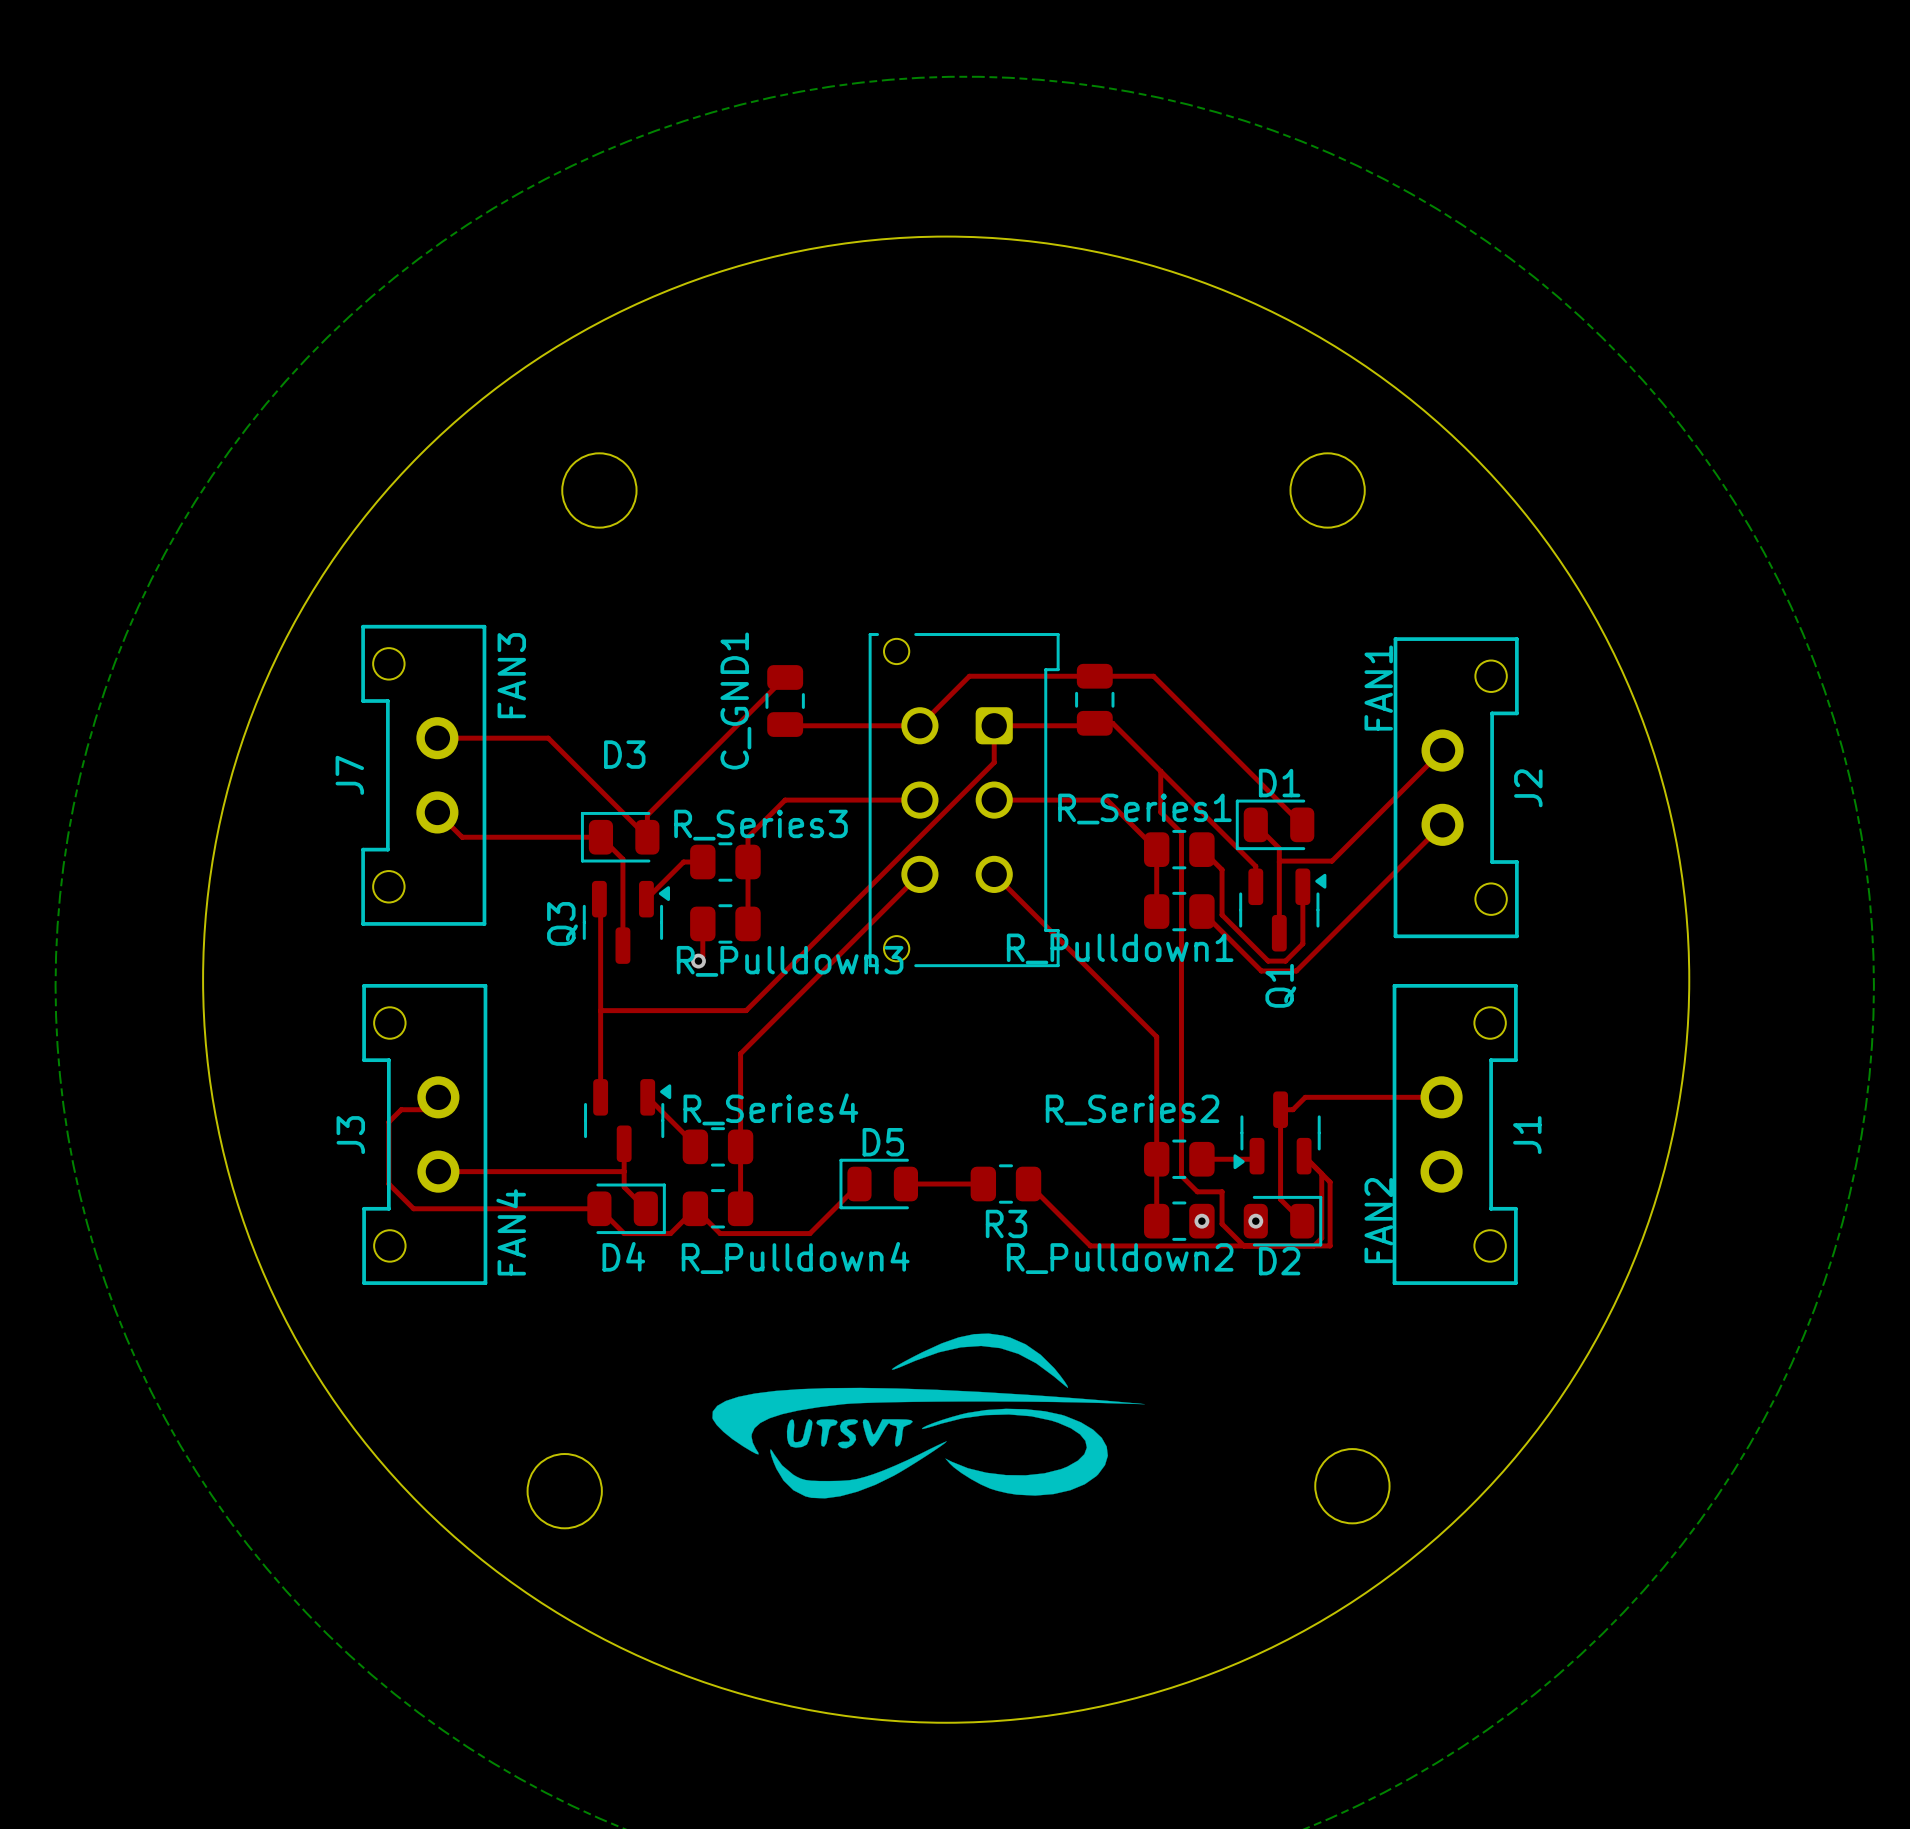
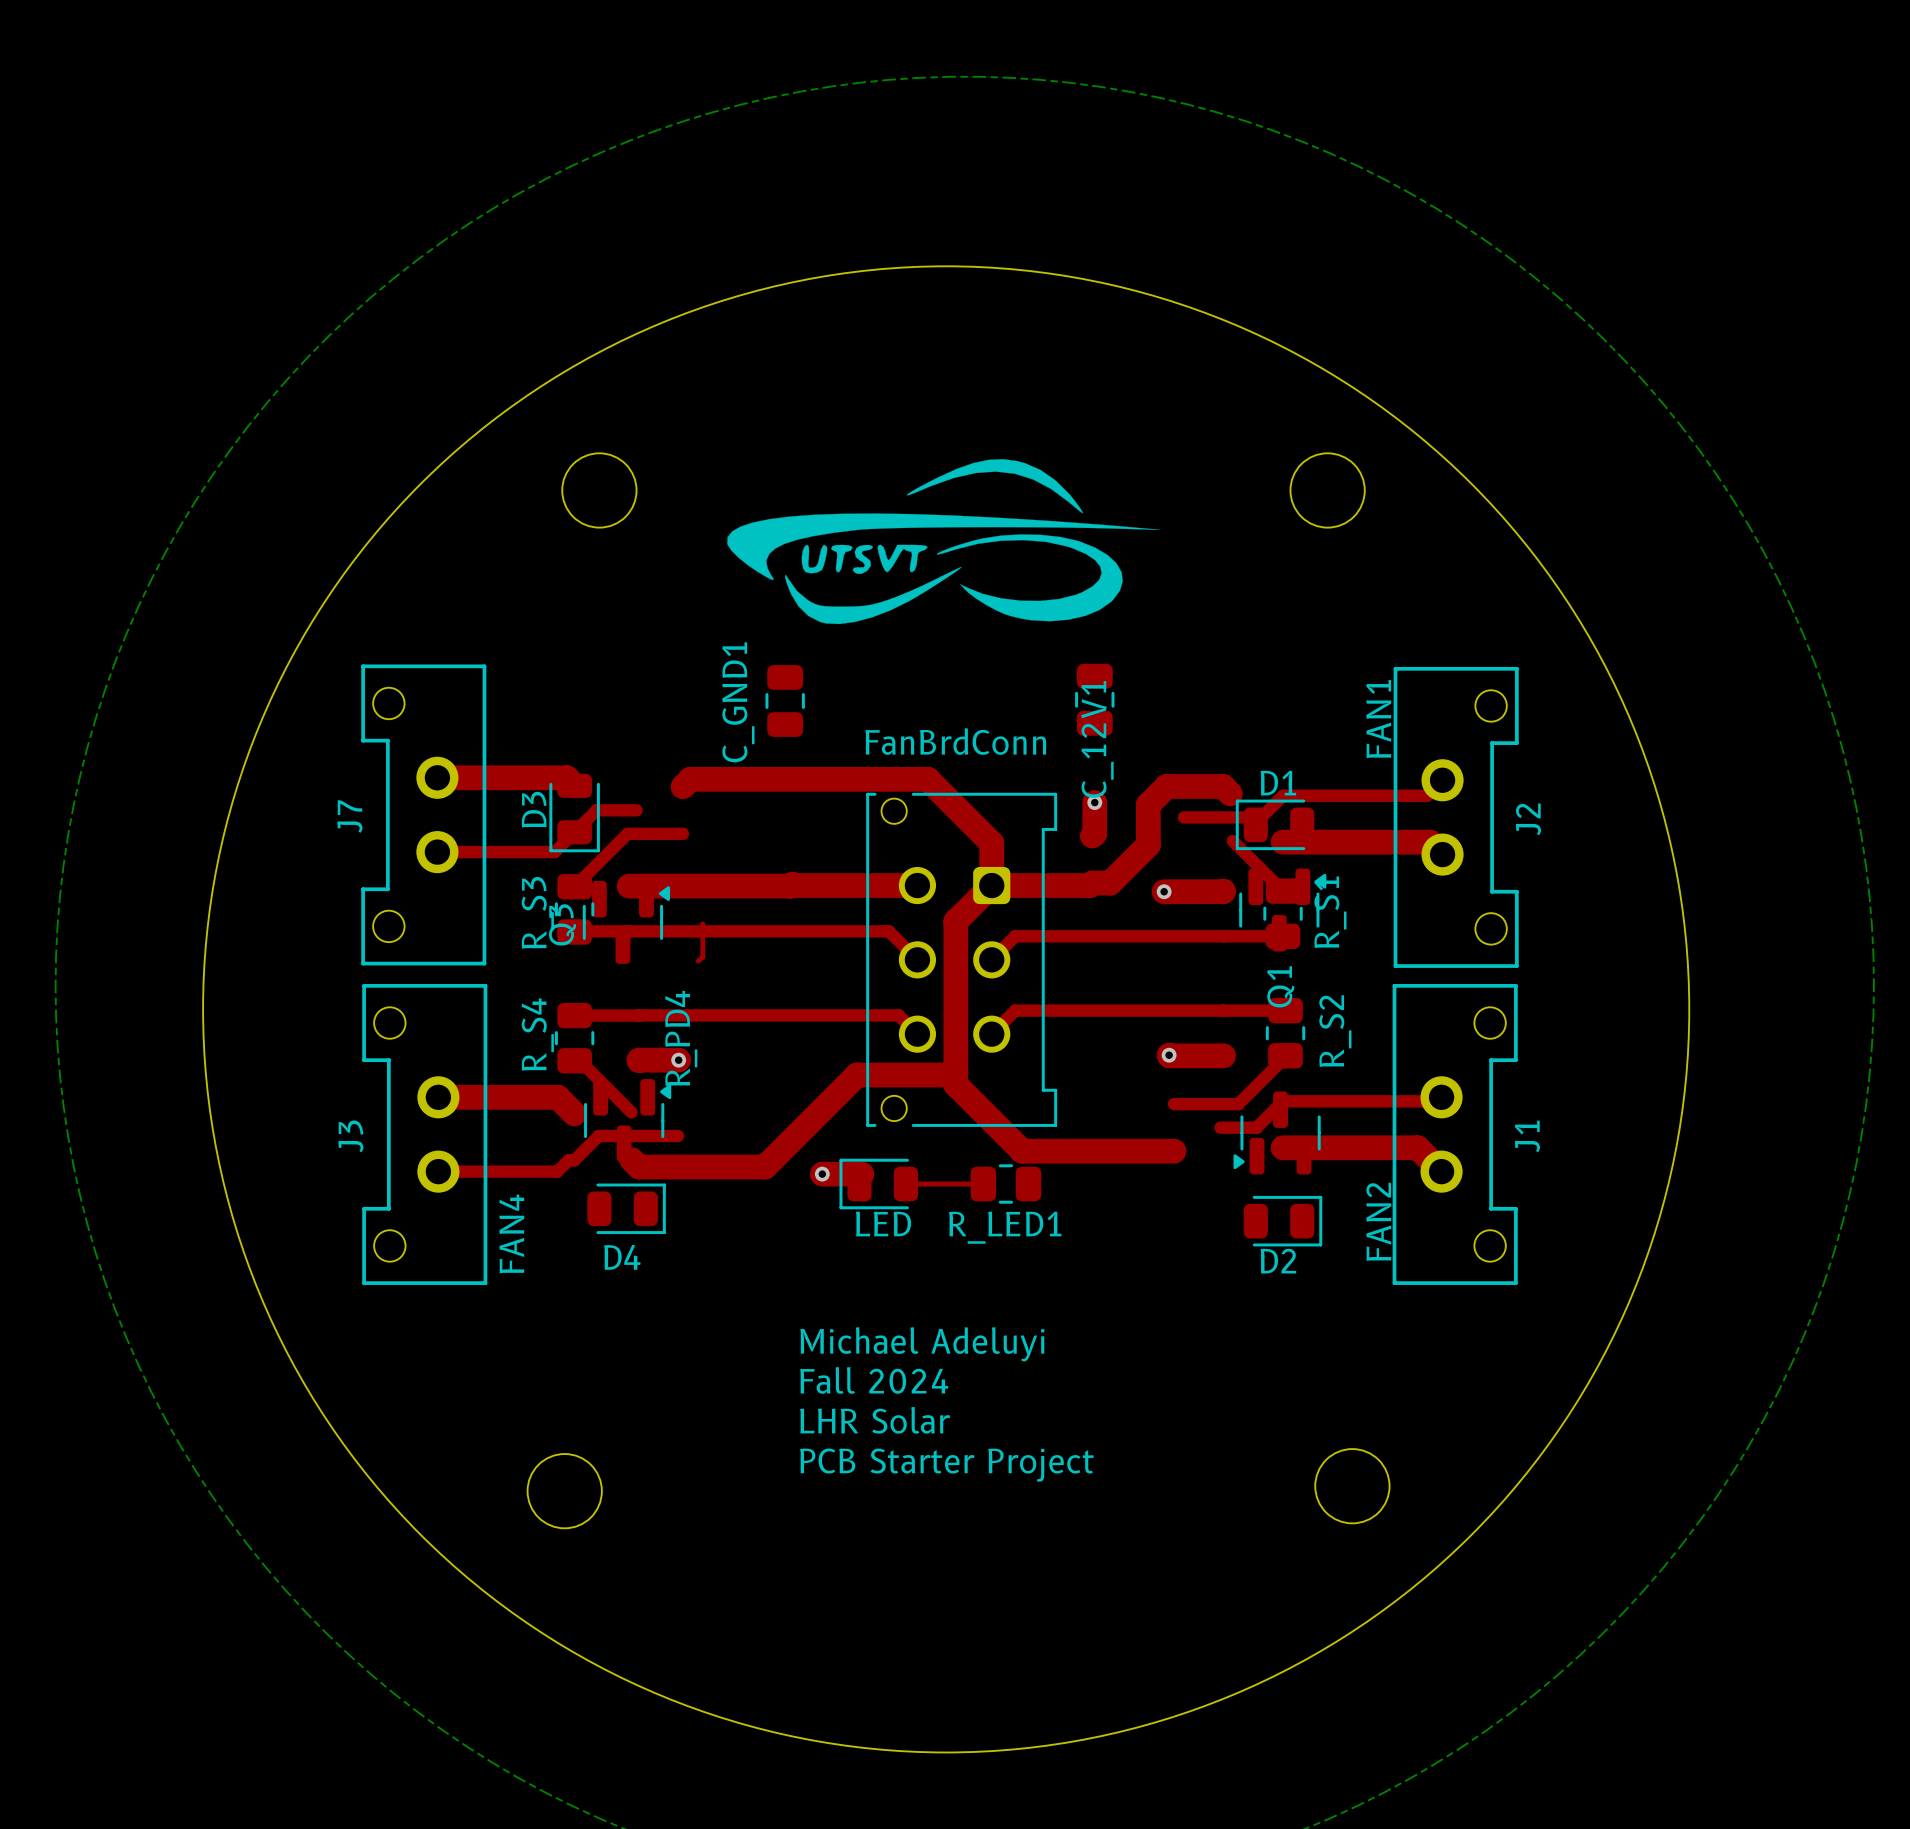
drawing: none -> [727, 459, 1160, 625]
J7 value: FAN3 (511, 675) -> none
top track: (785, 677) (647, 815) (647, 837) (548, 738) (437, 738) -> none
top track: (785, 724) (919, 725) (969, 676) (1153, 676) (1302, 824) -> none
text: none -> C_12V1 (1097, 739)
top track: (1442, 750) (1332, 861) (1279, 862) -> none
top track: (1160, 771) (1160, 812) (1181, 832) (1181, 1175) (1197, 1191) (1222, 1191) (1222, 1223) (1244, 1245) -> none
J7 position: (423, 775) -> (423, 814)
top track: none -> (437, 777) (566, 777) (574, 785)
top track: none -> (1442, 780) (1427, 795) (1283, 795) (1261, 817) (1183, 817)
top track: none -> (682, 786) (690, 779) (927, 779) (991, 843) (991, 885)
J2 position: (1456, 787) -> (1456, 817)
top track: none -> (1230, 793) (1222, 786) (1166, 786) (1148, 804) (1148, 844) (1110, 883) (1092, 883) (1089, 885) (991, 885)
top track: (919, 800) (785, 800) (748, 837) (748, 923) -> none
part: (964, 800) -> none
top track: (994, 800) (1107, 800) (1156, 849) (1156, 911) (1158, 913) -> none
top track: none -> (1094, 802) (1094, 833) (1092, 836)
via: none -> (1094, 802)
top track: none -> (636, 810) (596, 810) (554, 852) (437, 852)
top track: (437, 812) (462, 837) (600, 837) (622, 859) (622, 945) -> none
top track: (1255, 824) (1279, 848) (1279, 933) -> none
top track: (1442, 824) (1296, 971) (1261, 971) (1201, 911) -> none
top track: none -> (682, 833) (627, 833) (574, 886)
D3 rotation: 0° (620, 837) -> 90° counterclockwise (574, 813)
D3 position: (620, 837) -> (574, 813)
top track: none -> (1232, 840) (1283, 891)
top track: none -> (1283, 842) (1430, 842) (1442, 854)
R_Series1: (1179, 849) -> none
top track: (1201, 849) (1222, 869) (1222, 914) (1268, 961) (1285, 961) (1302, 943) (1302, 886) -> none
top track: (702, 862) (683, 862) (646, 899) -> none
R_Series3: (725, 862) -> none
top track: (919, 874) (740, 1053) (740, 1208) -> none
top track: (994, 874) (1156, 1036) (1156, 1221) -> none
top track: none -> (917, 885) (792, 884) (790, 886) (629, 886)
top track: none -> (991, 885) (955, 921) (955, 1084) (1022, 1151) (1174, 1151)
top track: (1255, 886) (1255, 866) (1112, 723) (1094, 723) (1092, 725) (994, 725) (994, 762) (746, 1010) (600, 1010) -> none
via: none -> (1164, 891)
top track: none -> (1223, 891) (1164, 891)
top track: (599, 899) (600, 1097) -> none
R_S3: none -> (574, 909)
R_Pulldown1: (1179, 911) -> none
R_S1: none -> (1283, 913)
R_Pulldown3: (725, 923) -> none
top track: none -> (574, 931) (888, 931) (917, 959)
top track: none -> (1283, 936) (1015, 936) (991, 959)
part: none -> FanBrdConn (961, 959)
via position: (698, 961) -> (678, 1060)
round board edge position: (946, 979) -> (946, 1009)
top track: none -> (1285, 1010) (1015, 1010) (991, 1034)
top track: none -> (574, 1015) (638, 1015)
top track: none -> (638, 1015) (898, 1015) (917, 1034)
R_S2: none -> (1285, 1033)
text: none -> R_PD4 (681, 1038)
R_S4: none -> (574, 1038)
top track: none -> (1169, 1055) (1223, 1055)
via: none -> (1169, 1055)
top track: none -> (1285, 1055) (1238, 1104) (1174, 1104)
top track: none -> (574, 1060) (579, 1060) (631, 1112)
top track: none -> (678, 1060) (638, 1060)
top track: none -> (955, 1070) (950, 1075) (857, 1075) (765, 1166) (639, 1166) (631, 1159)
top track: (438, 1097) (426, 1109) (401, 1109) (388, 1122) (388, 1184) (413, 1208) (599, 1208) (624, 1233) (670, 1233) (695, 1208) (720, 1233) (809, 1233) (859, 1184) -> (438, 1097) (557, 1097) (574, 1113)
top track: (647, 1097) (695, 1146) -> none
top track: (1441, 1097) (1305, 1097) (1292, 1109) (1280, 1109) (1280, 1199) (1302, 1221) -> (1441, 1097) (1437, 1101) (1283, 1101) (1256, 1127) (1220, 1127)
D5 name: D5 (883, 1142) -> none
top track: (624, 1143) (624, 1187) (645, 1208) -> none
R_Series4: (717, 1146) -> none
top track: none -> (1283, 1147) (1417, 1147) (1441, 1171)
top track: (1257, 1156) (1253, 1159) (1201, 1159) -> none
top track: (1304, 1156) (1330, 1182) (1330, 1245) (1090, 1245) (1028, 1184) -> none
R_Series2: (1179, 1159) -> none
top track width: thin (438, 1171) (557, 1171) -> thick (438, 1171) (557, 1171)
top track: (557, 1171) (624, 1171) -> (557, 1171) (568, 1160) (574, 1160) (598, 1136) (678, 1136)
top track: (1321, 1173) (1321, 1238) (1314, 1245) -> none
top track: none -> (822, 1174) (861, 1174)
via: none -> (822, 1174)
R_Pulldown4: (717, 1208) -> none
R_Pulldown2: (1179, 1221) -> none
via: (1201, 1221) -> none
via: (1255, 1221) -> none
D5 value: none -> LED (883, 1223)
R3 name: R3 (1006, 1223) -> R_LED1 (1005, 1227)
drawing: [712, 1333, 1145, 1499] -> none
text: none -> Michael Adeluyi (922, 1344)
text: none -> Fall 2024 (874, 1380)
text: none -> LHR Solar (875, 1420)
text: none -> PCB Starter Project (946, 1465)

